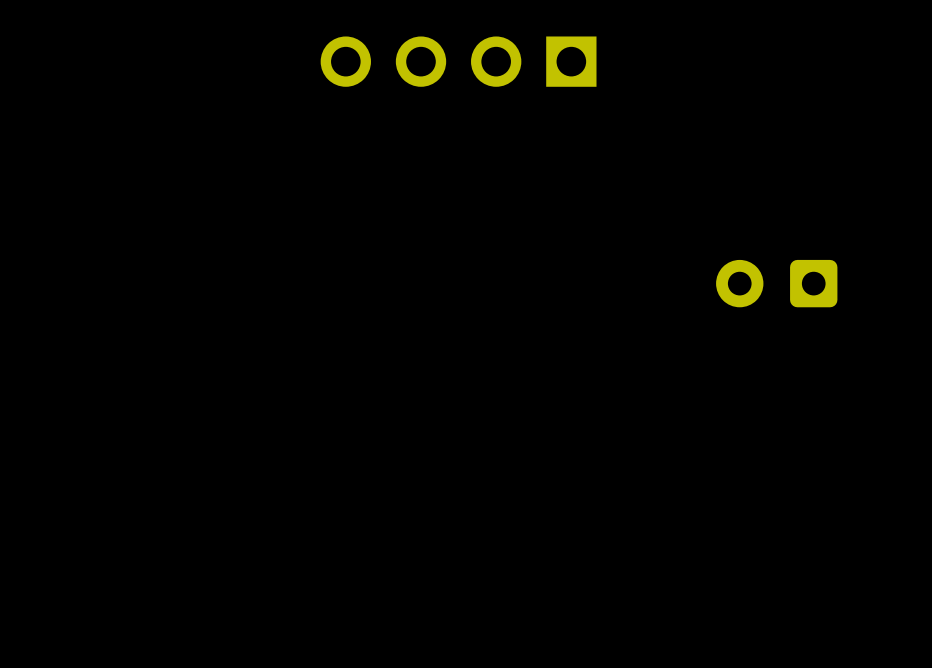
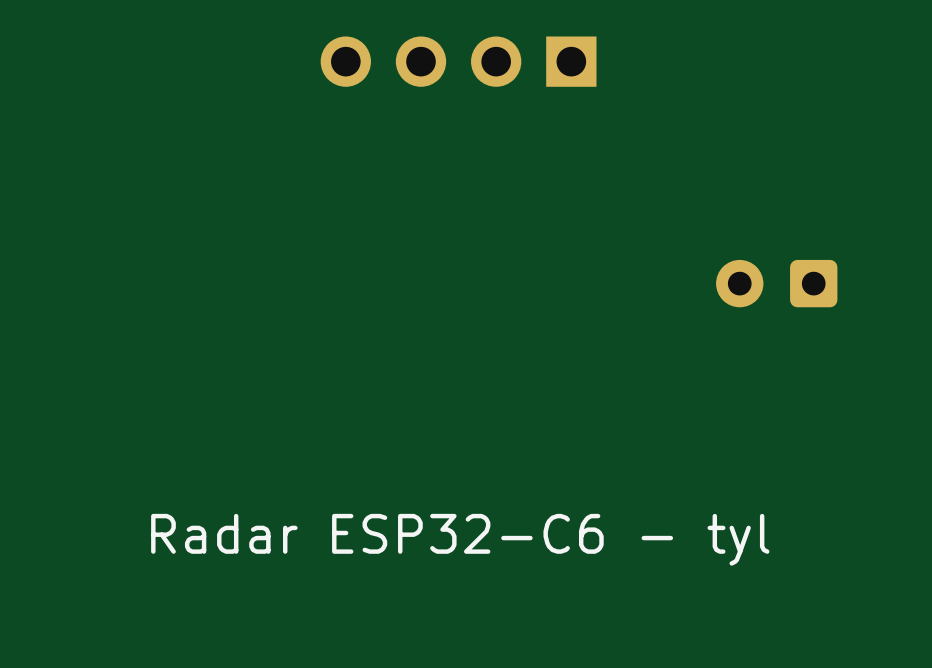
text: none -> Radar ESP32-C6 - tyl (460, 539)

